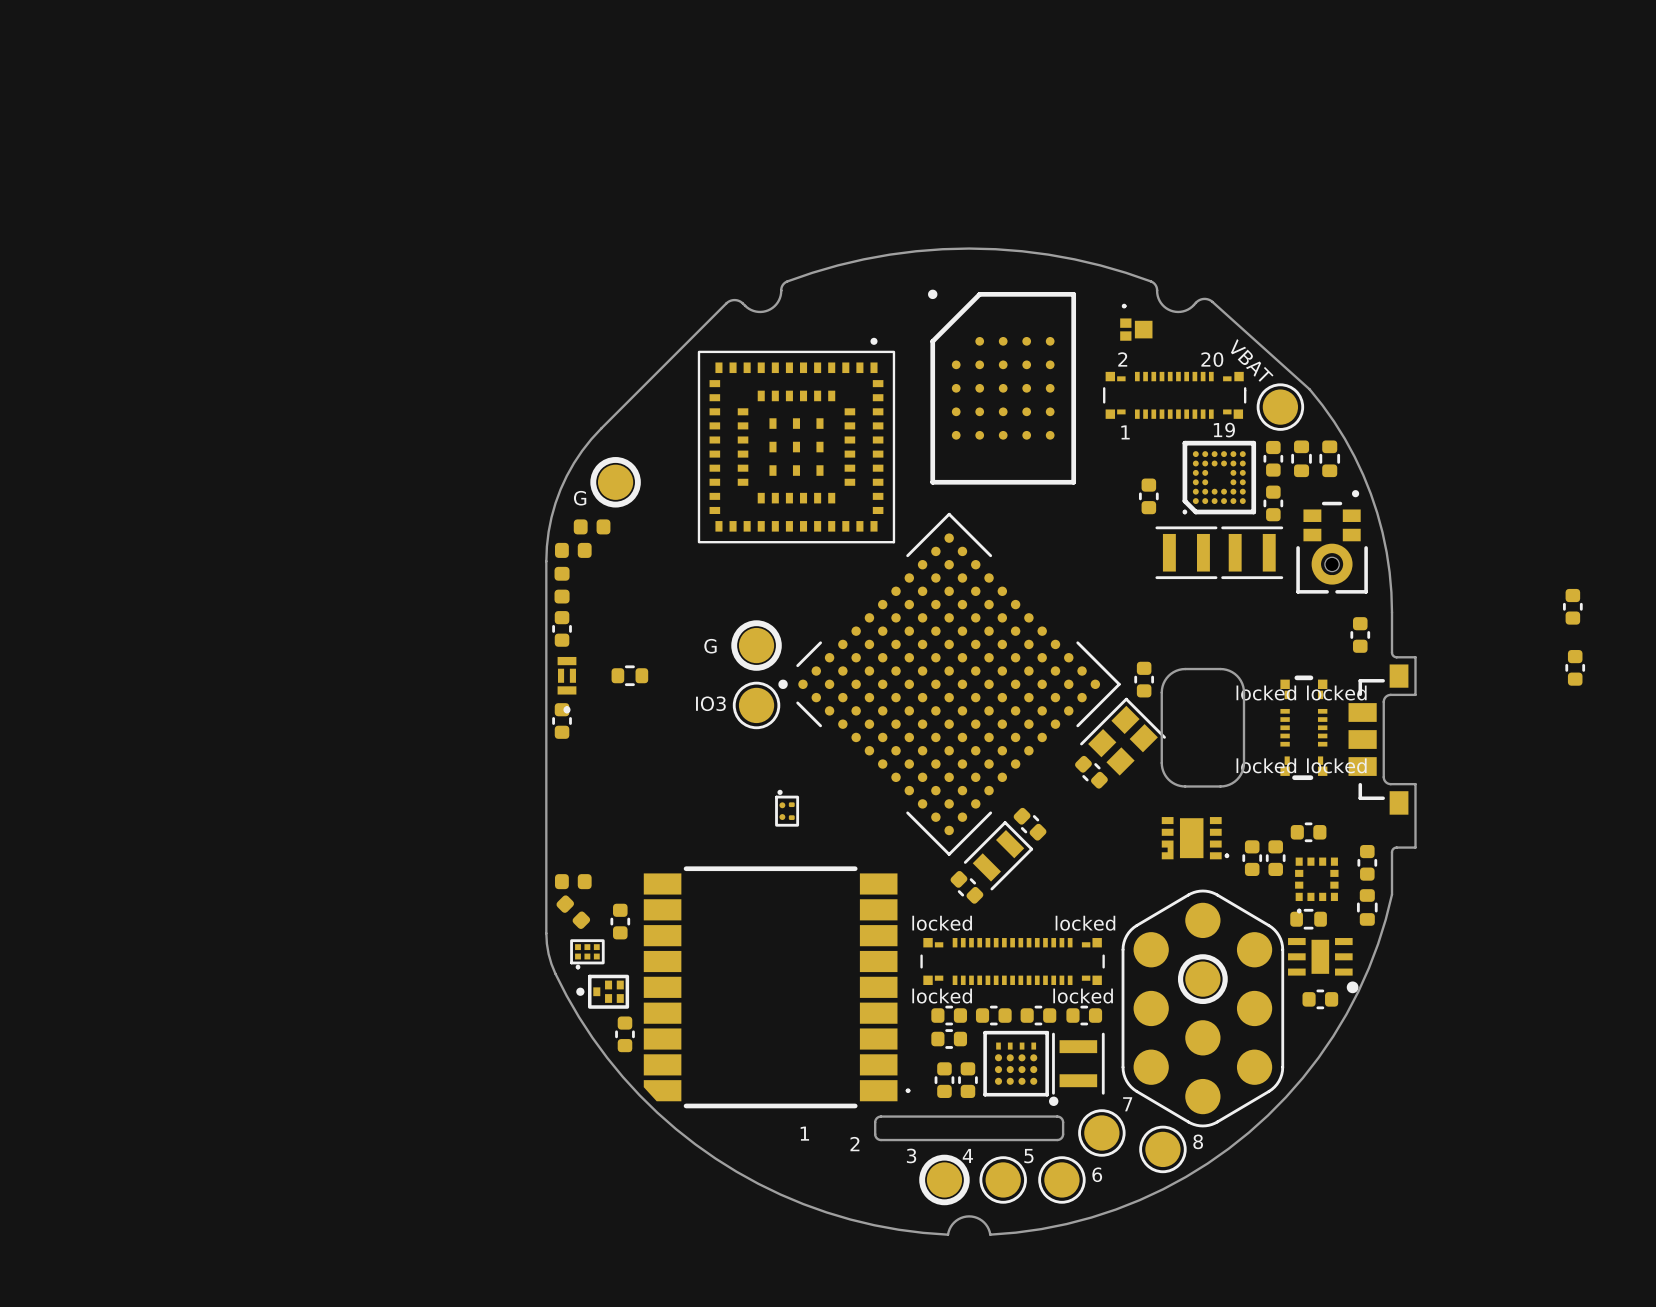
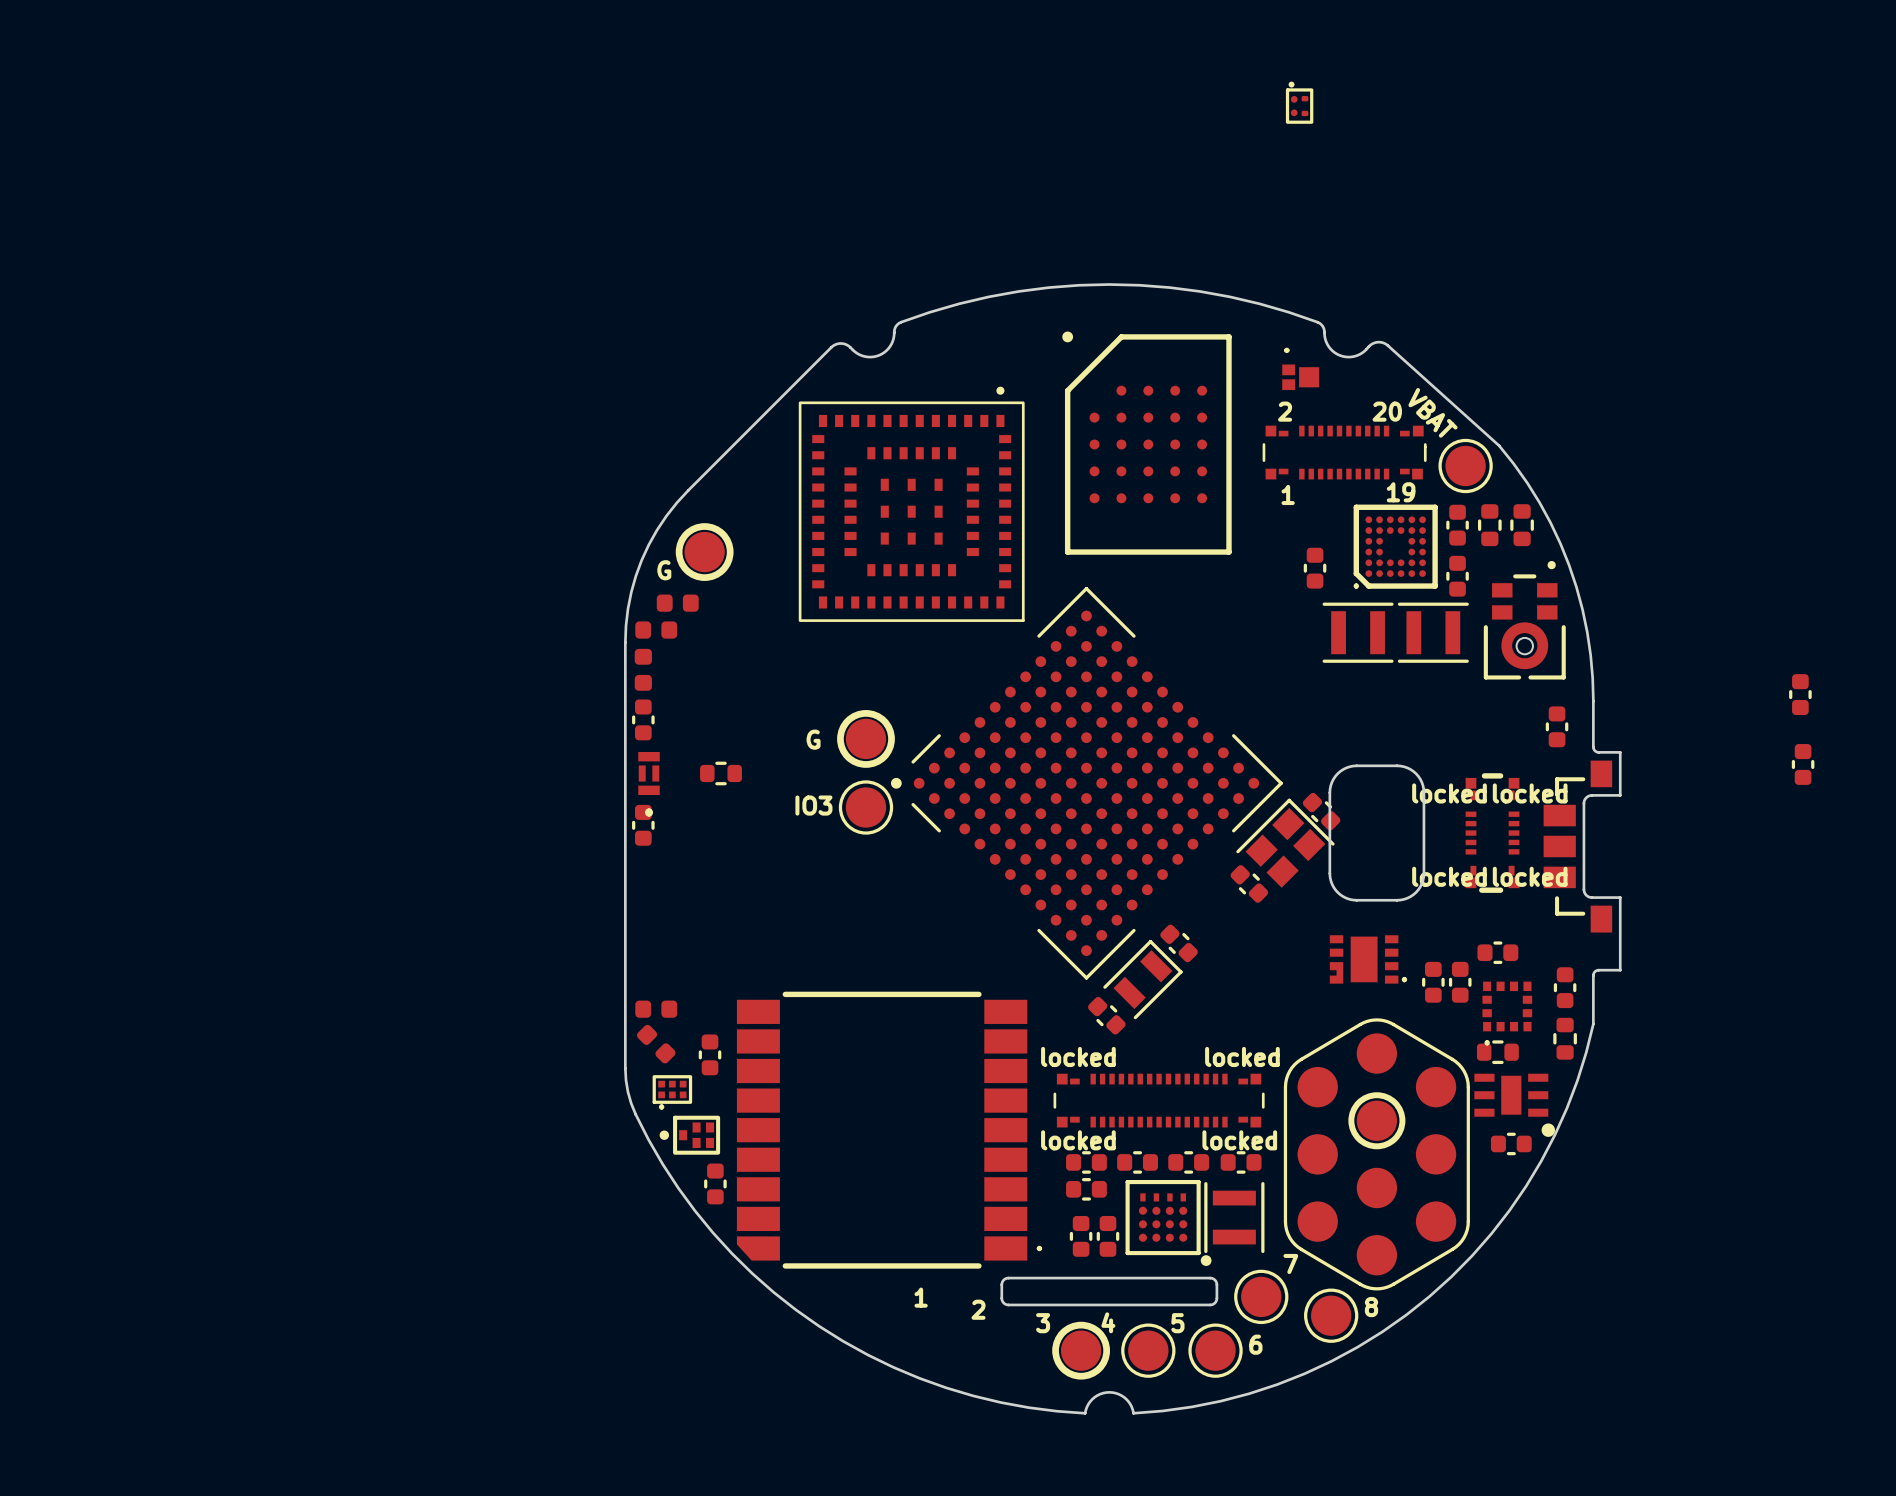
part: none -> (1299, 102)
part: (1144, 679) -> none
part: none -> (1321, 811)
part: (787, 808) -> none

